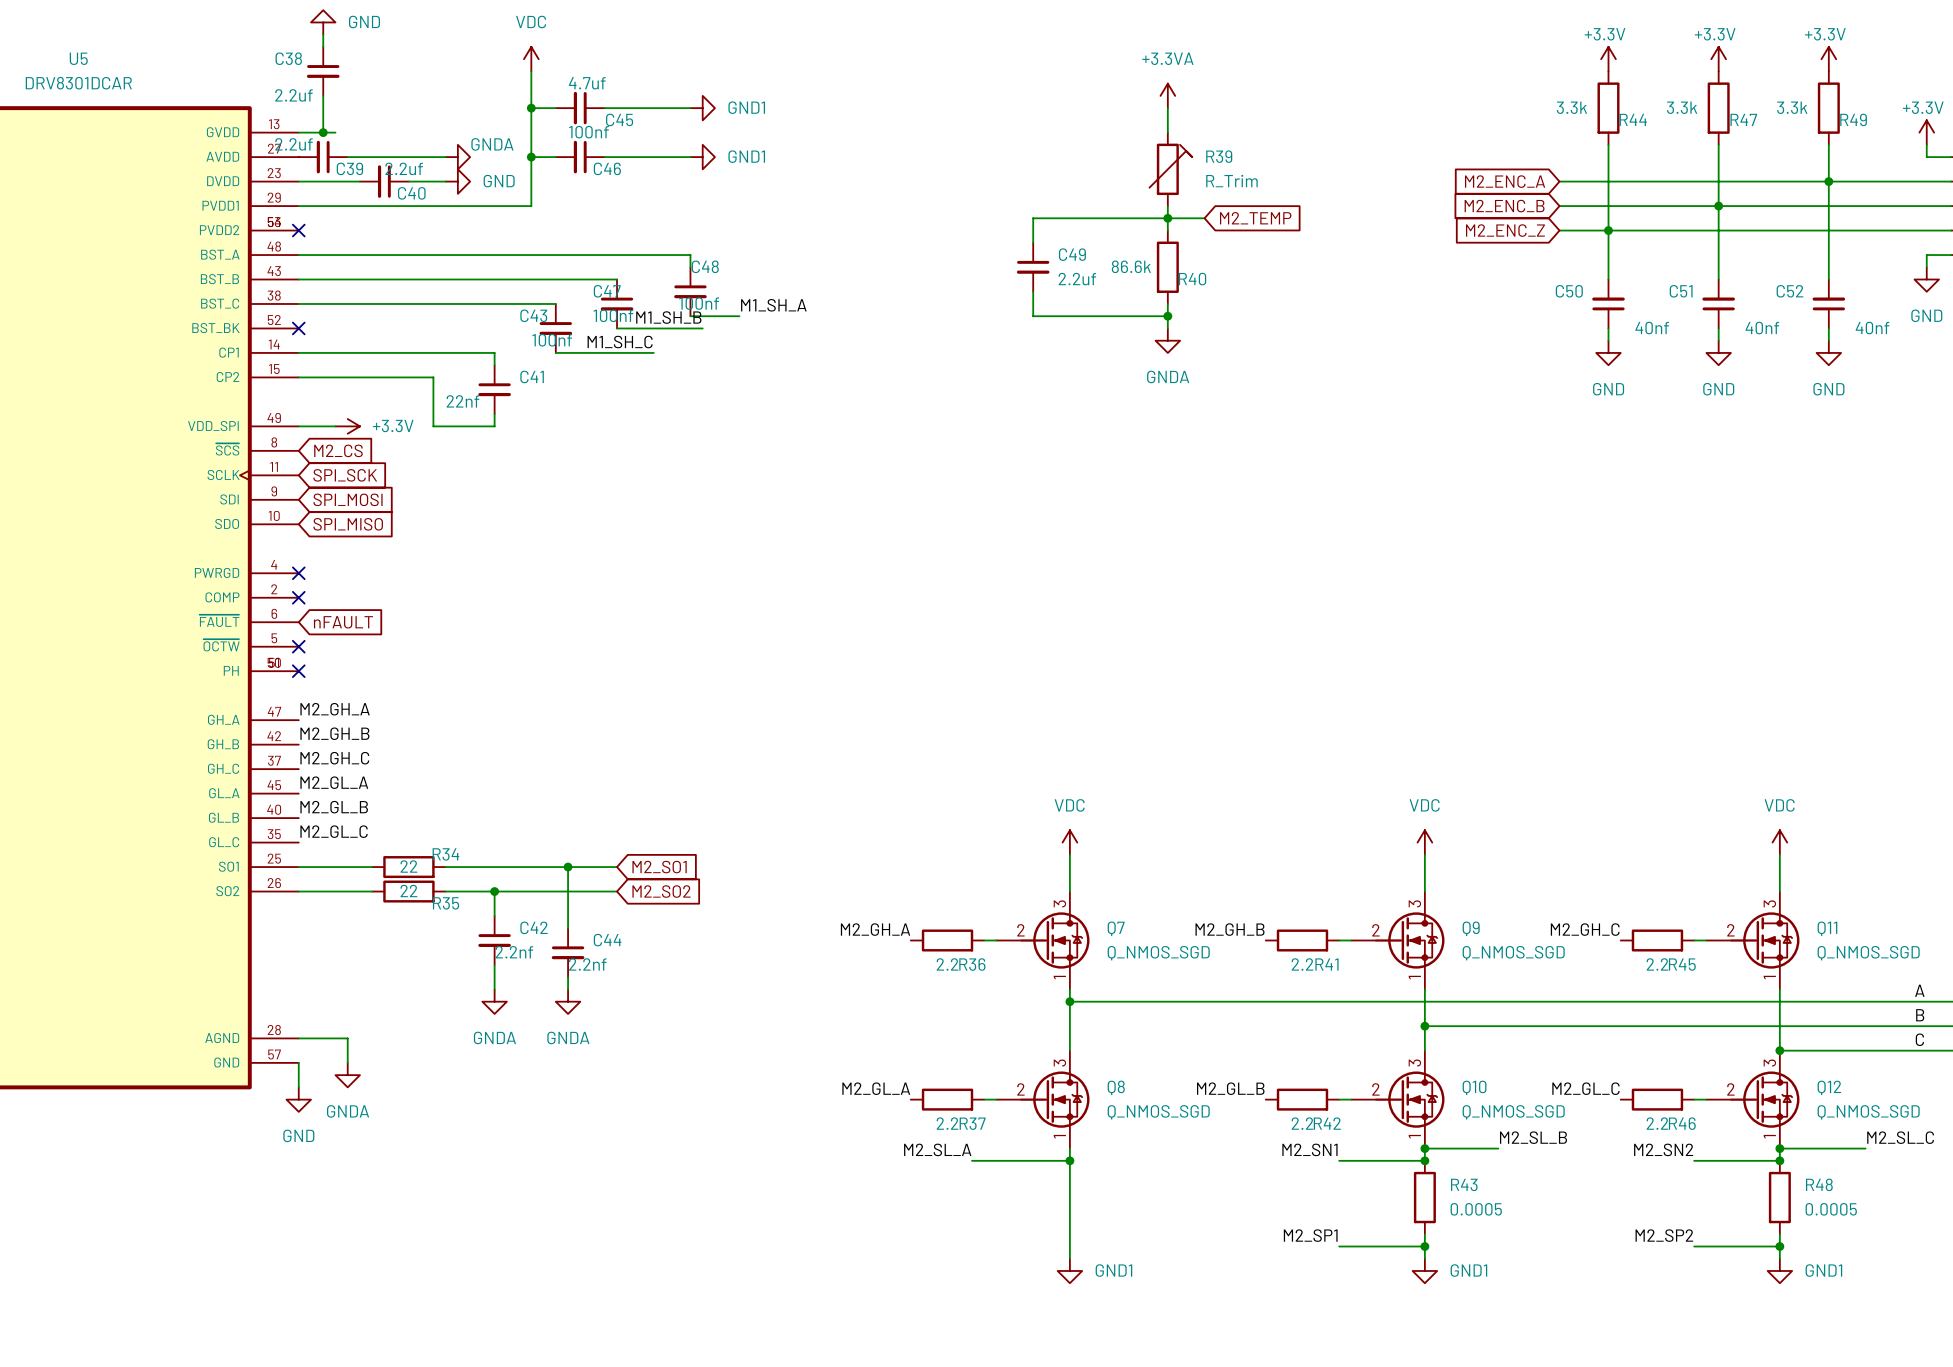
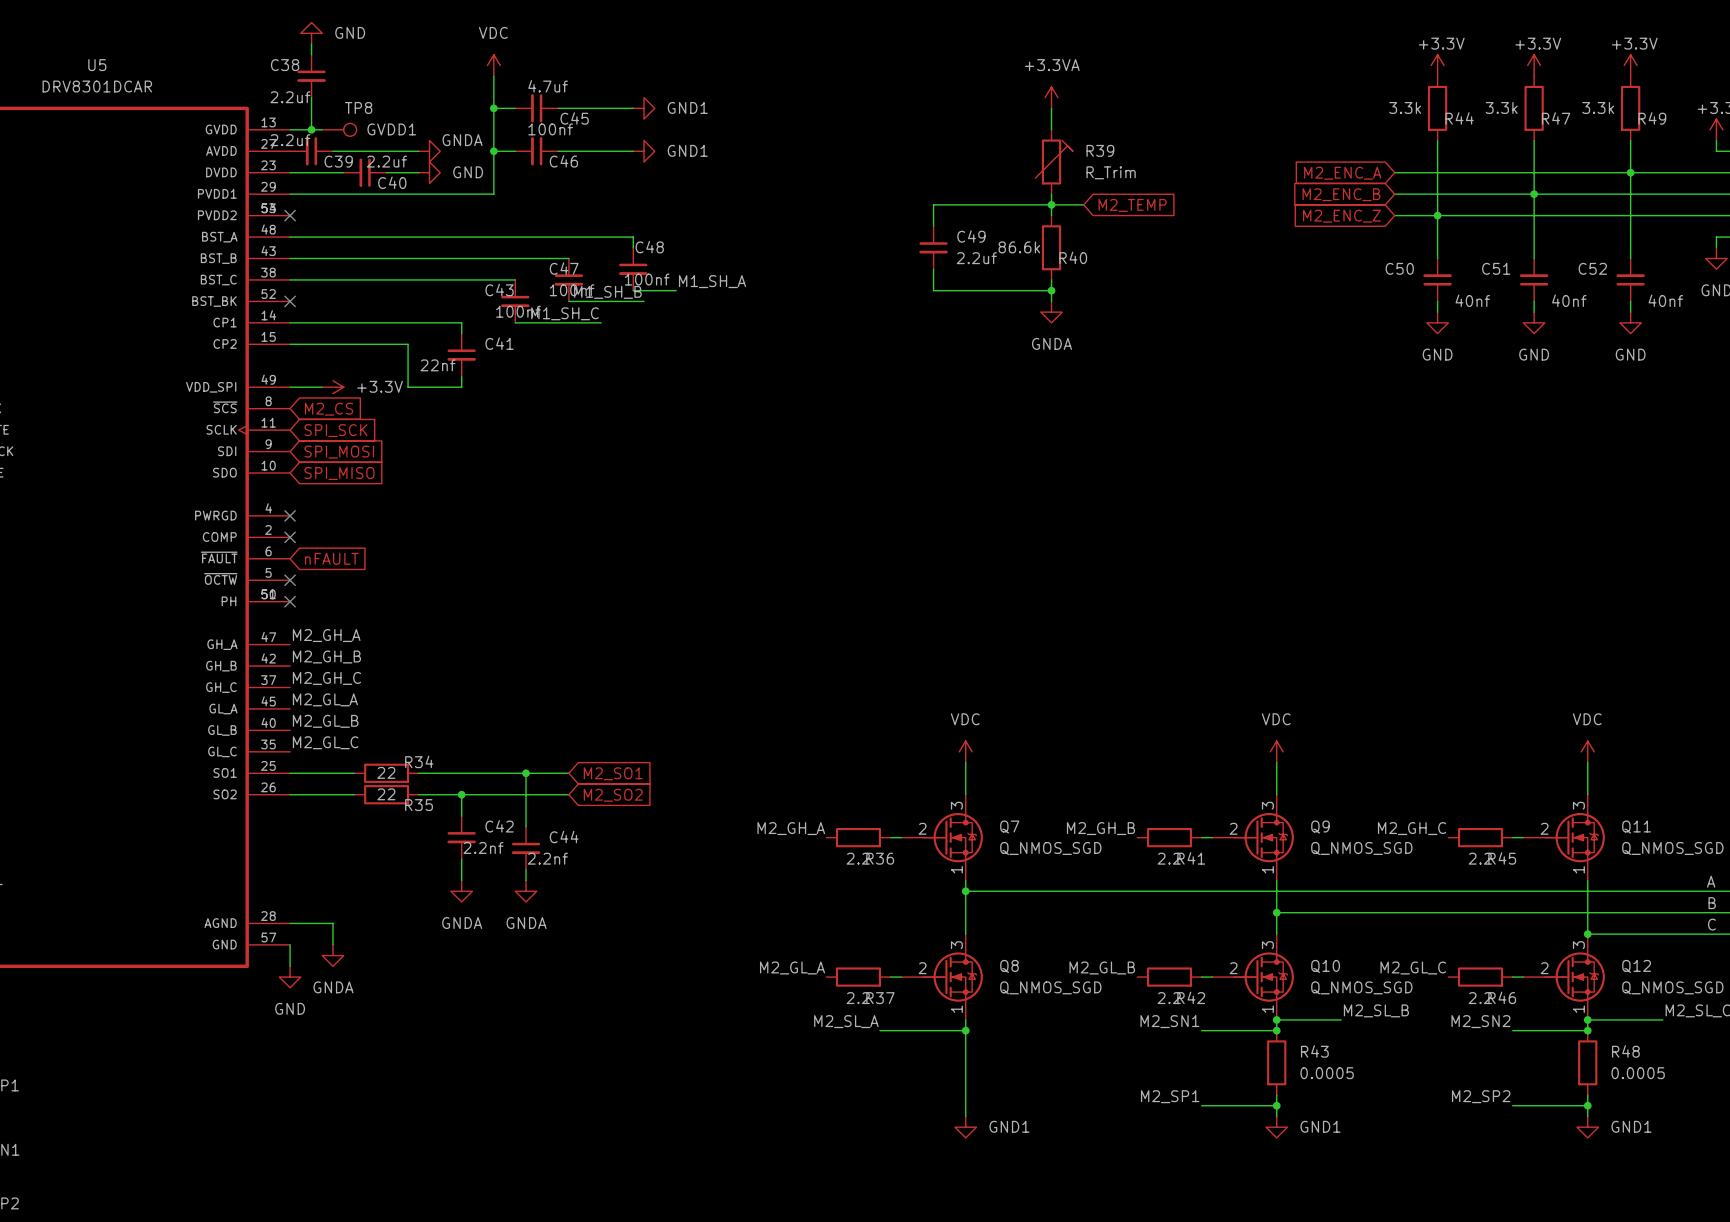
TP8: none -> GVDD1 (339, 129)

